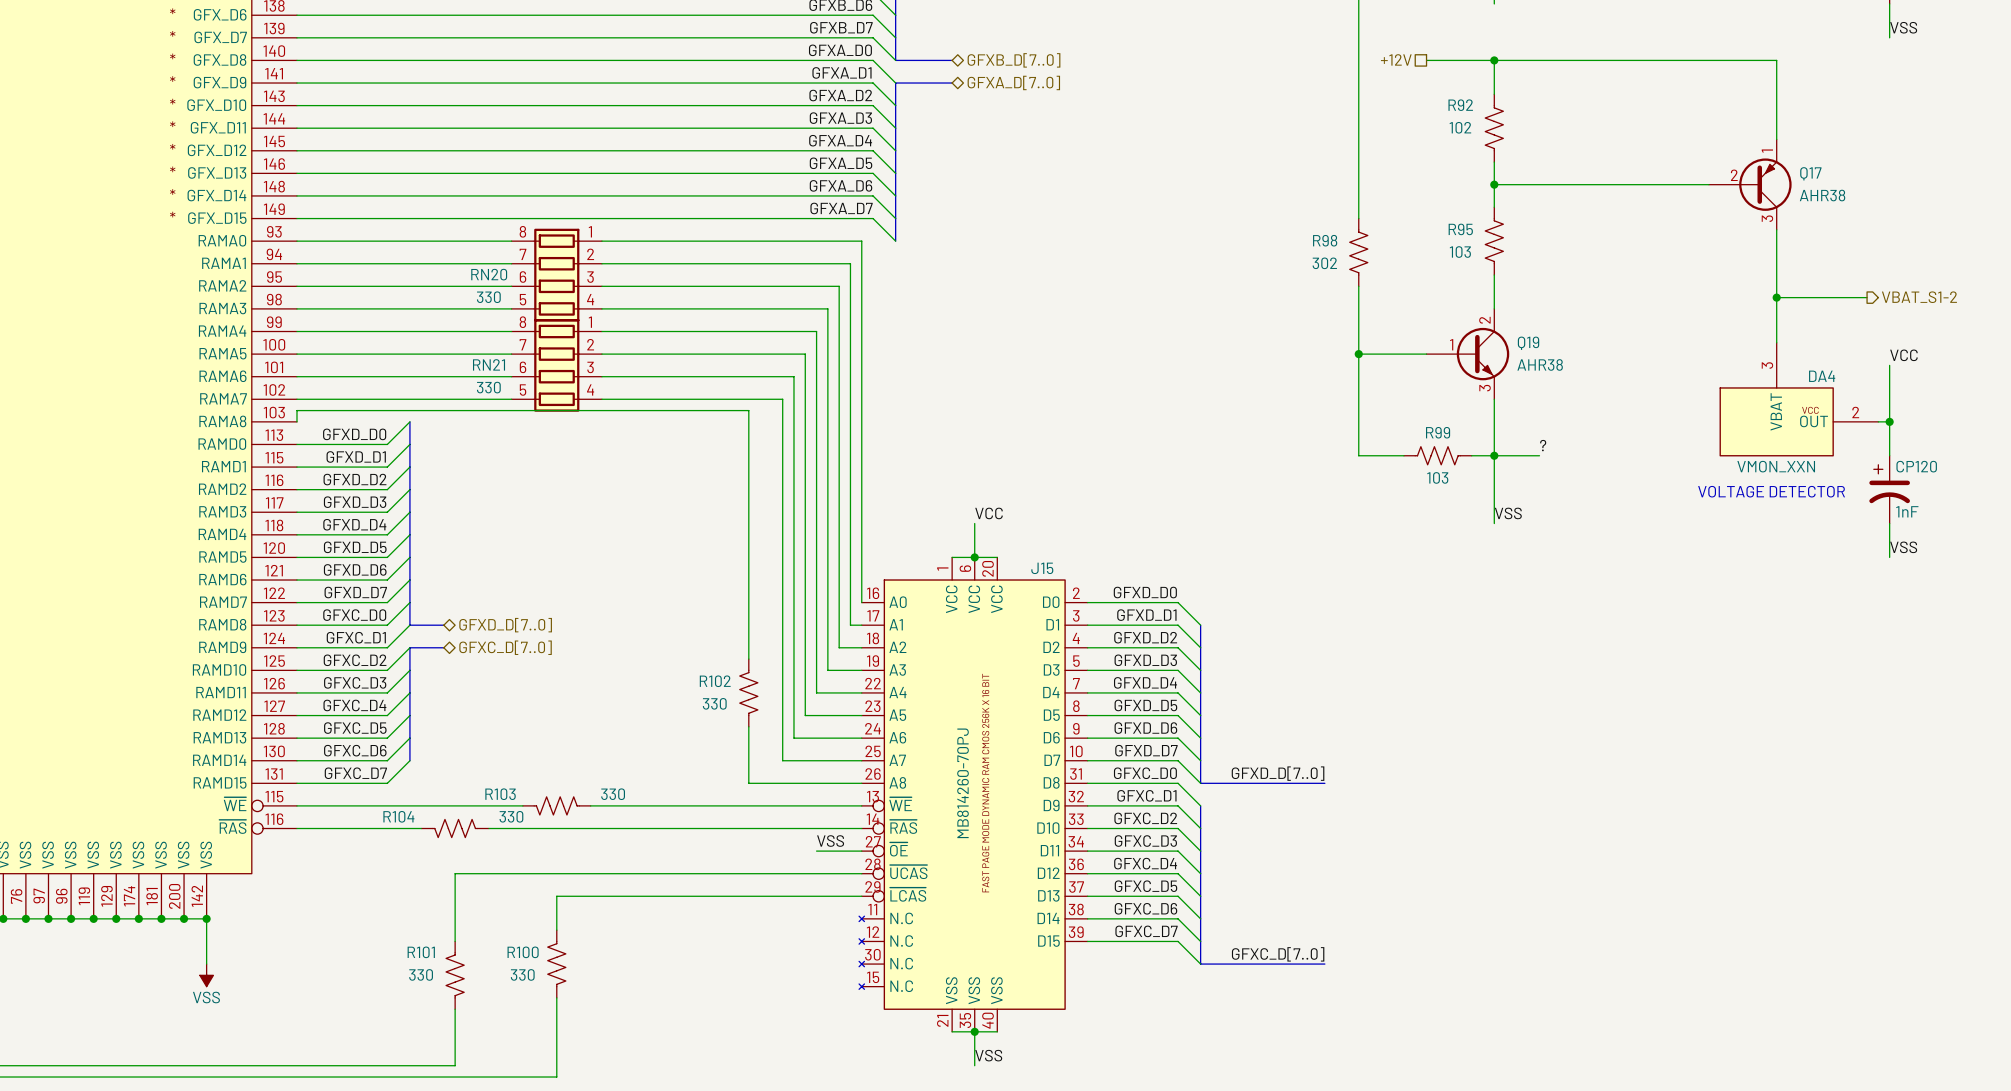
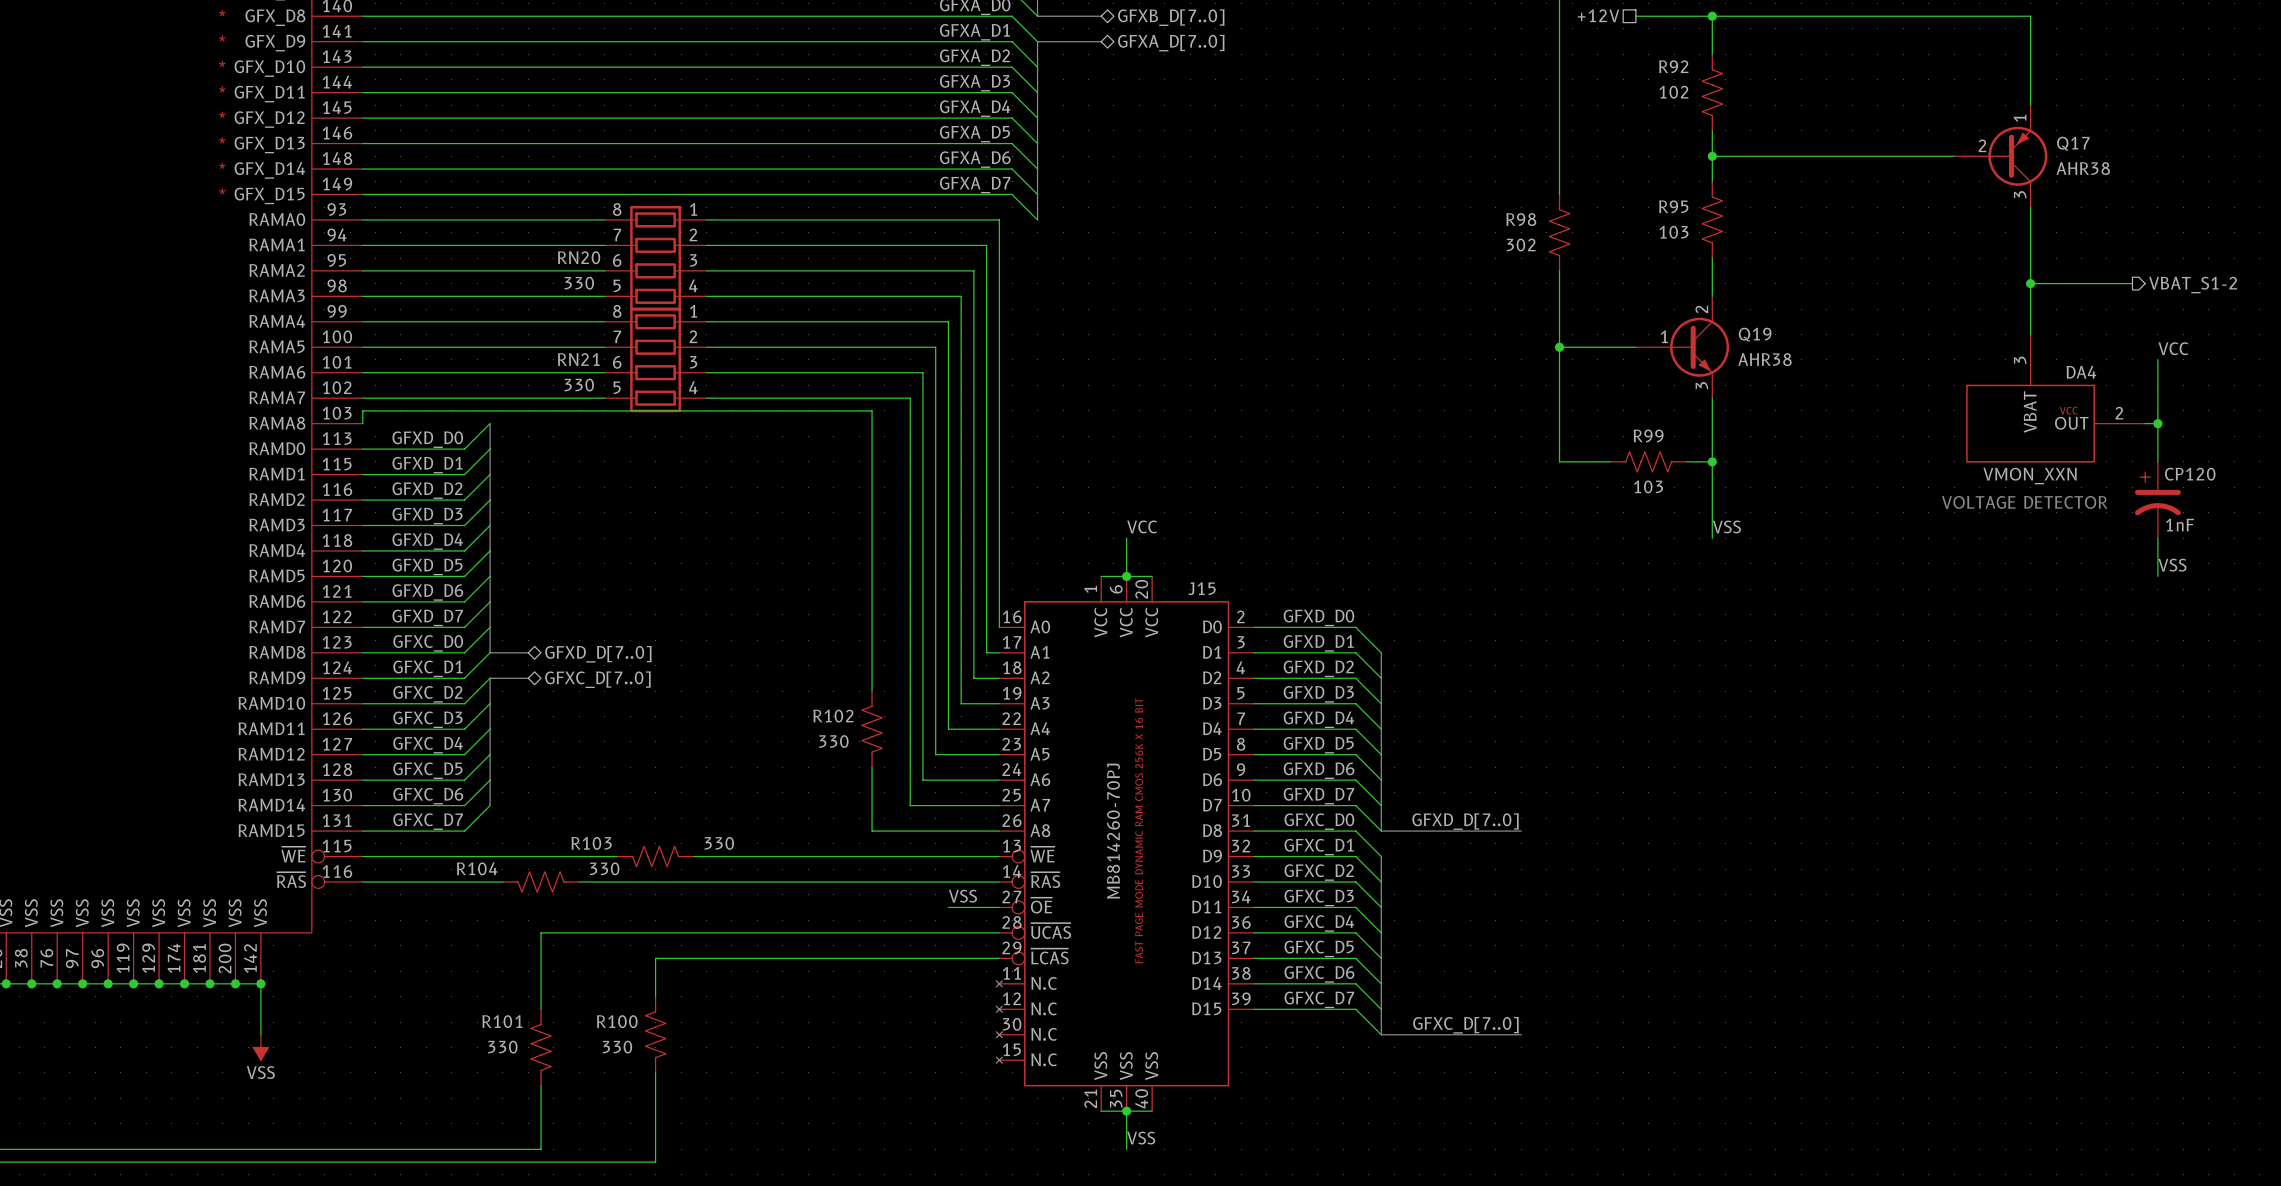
label: ? (1543, 445) -> none
wire: (1494, 455) (1539, 455) -> none

